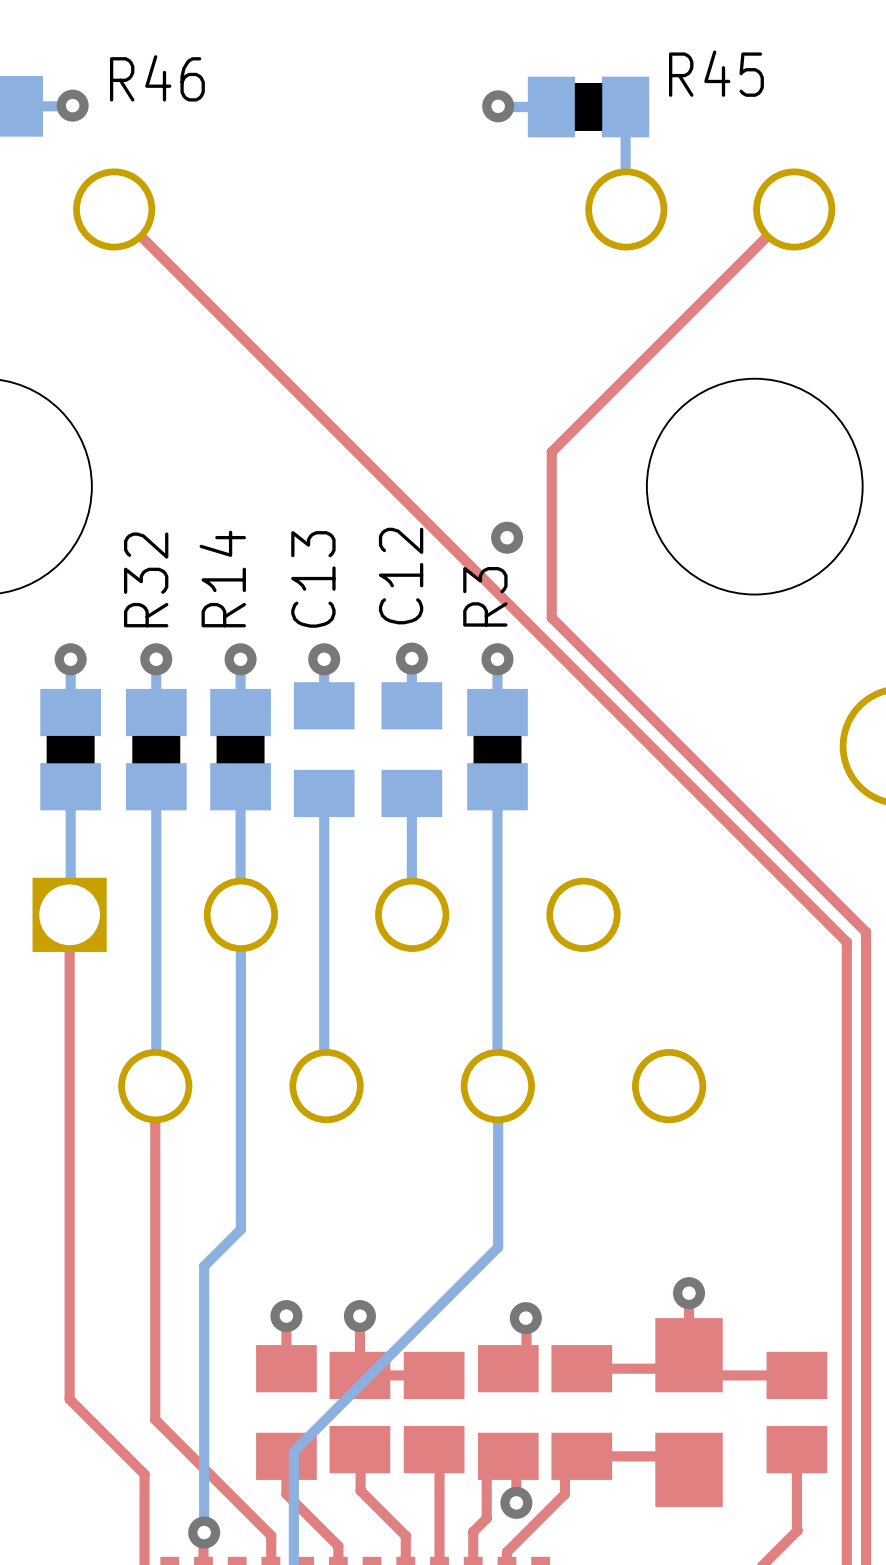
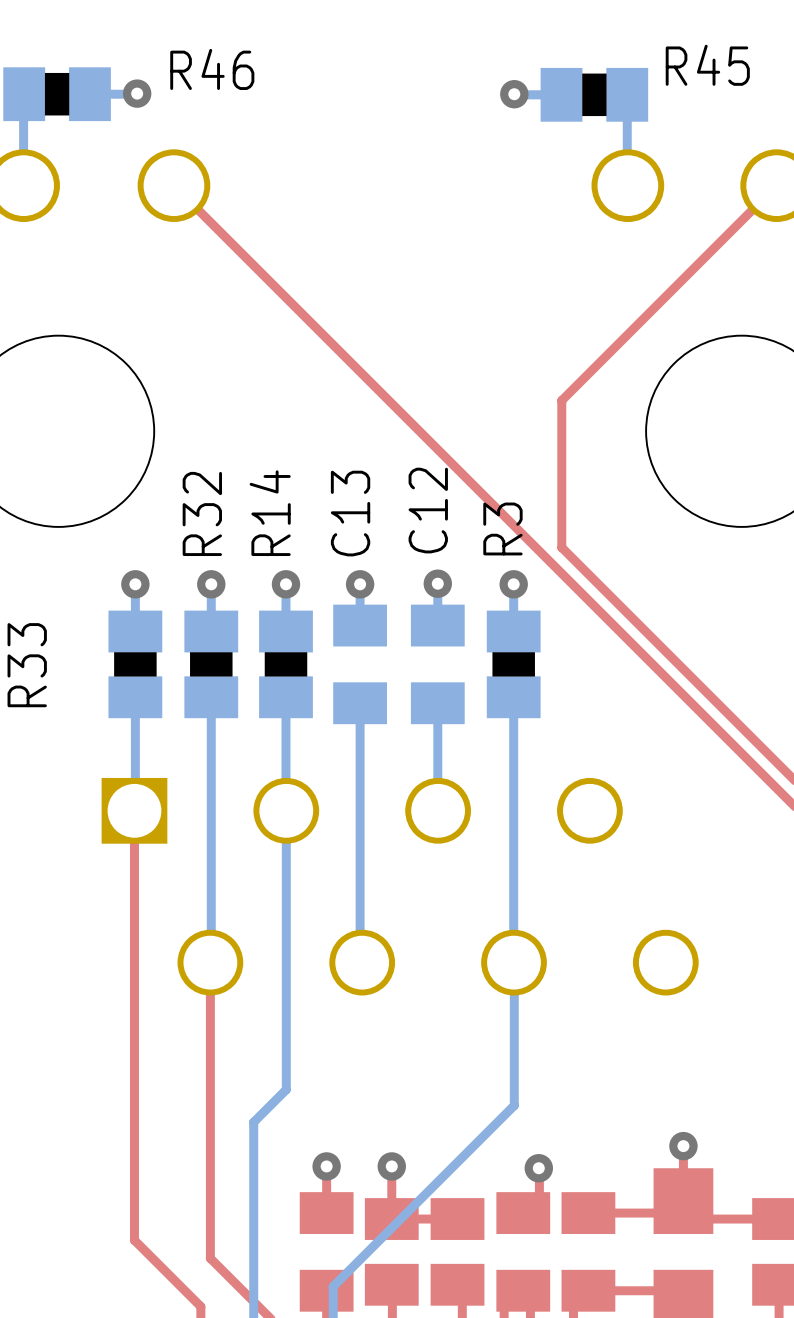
via: (507, 537) -> none

